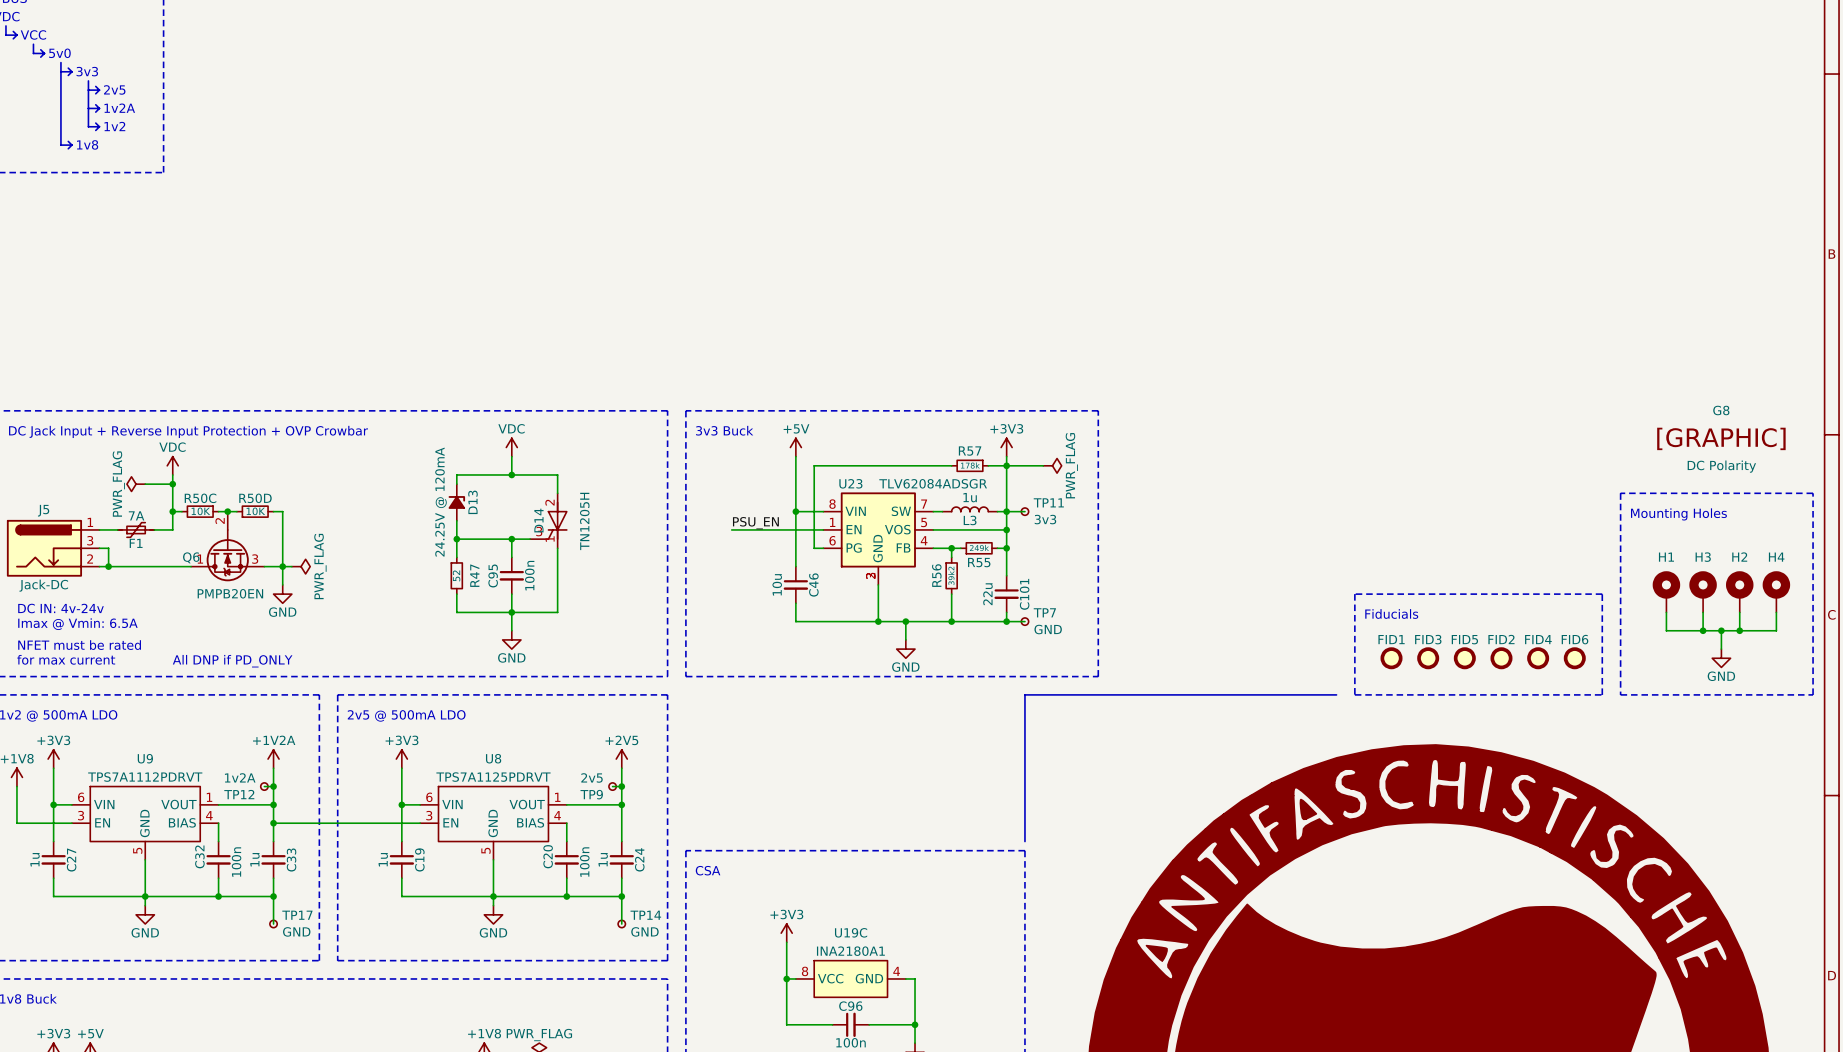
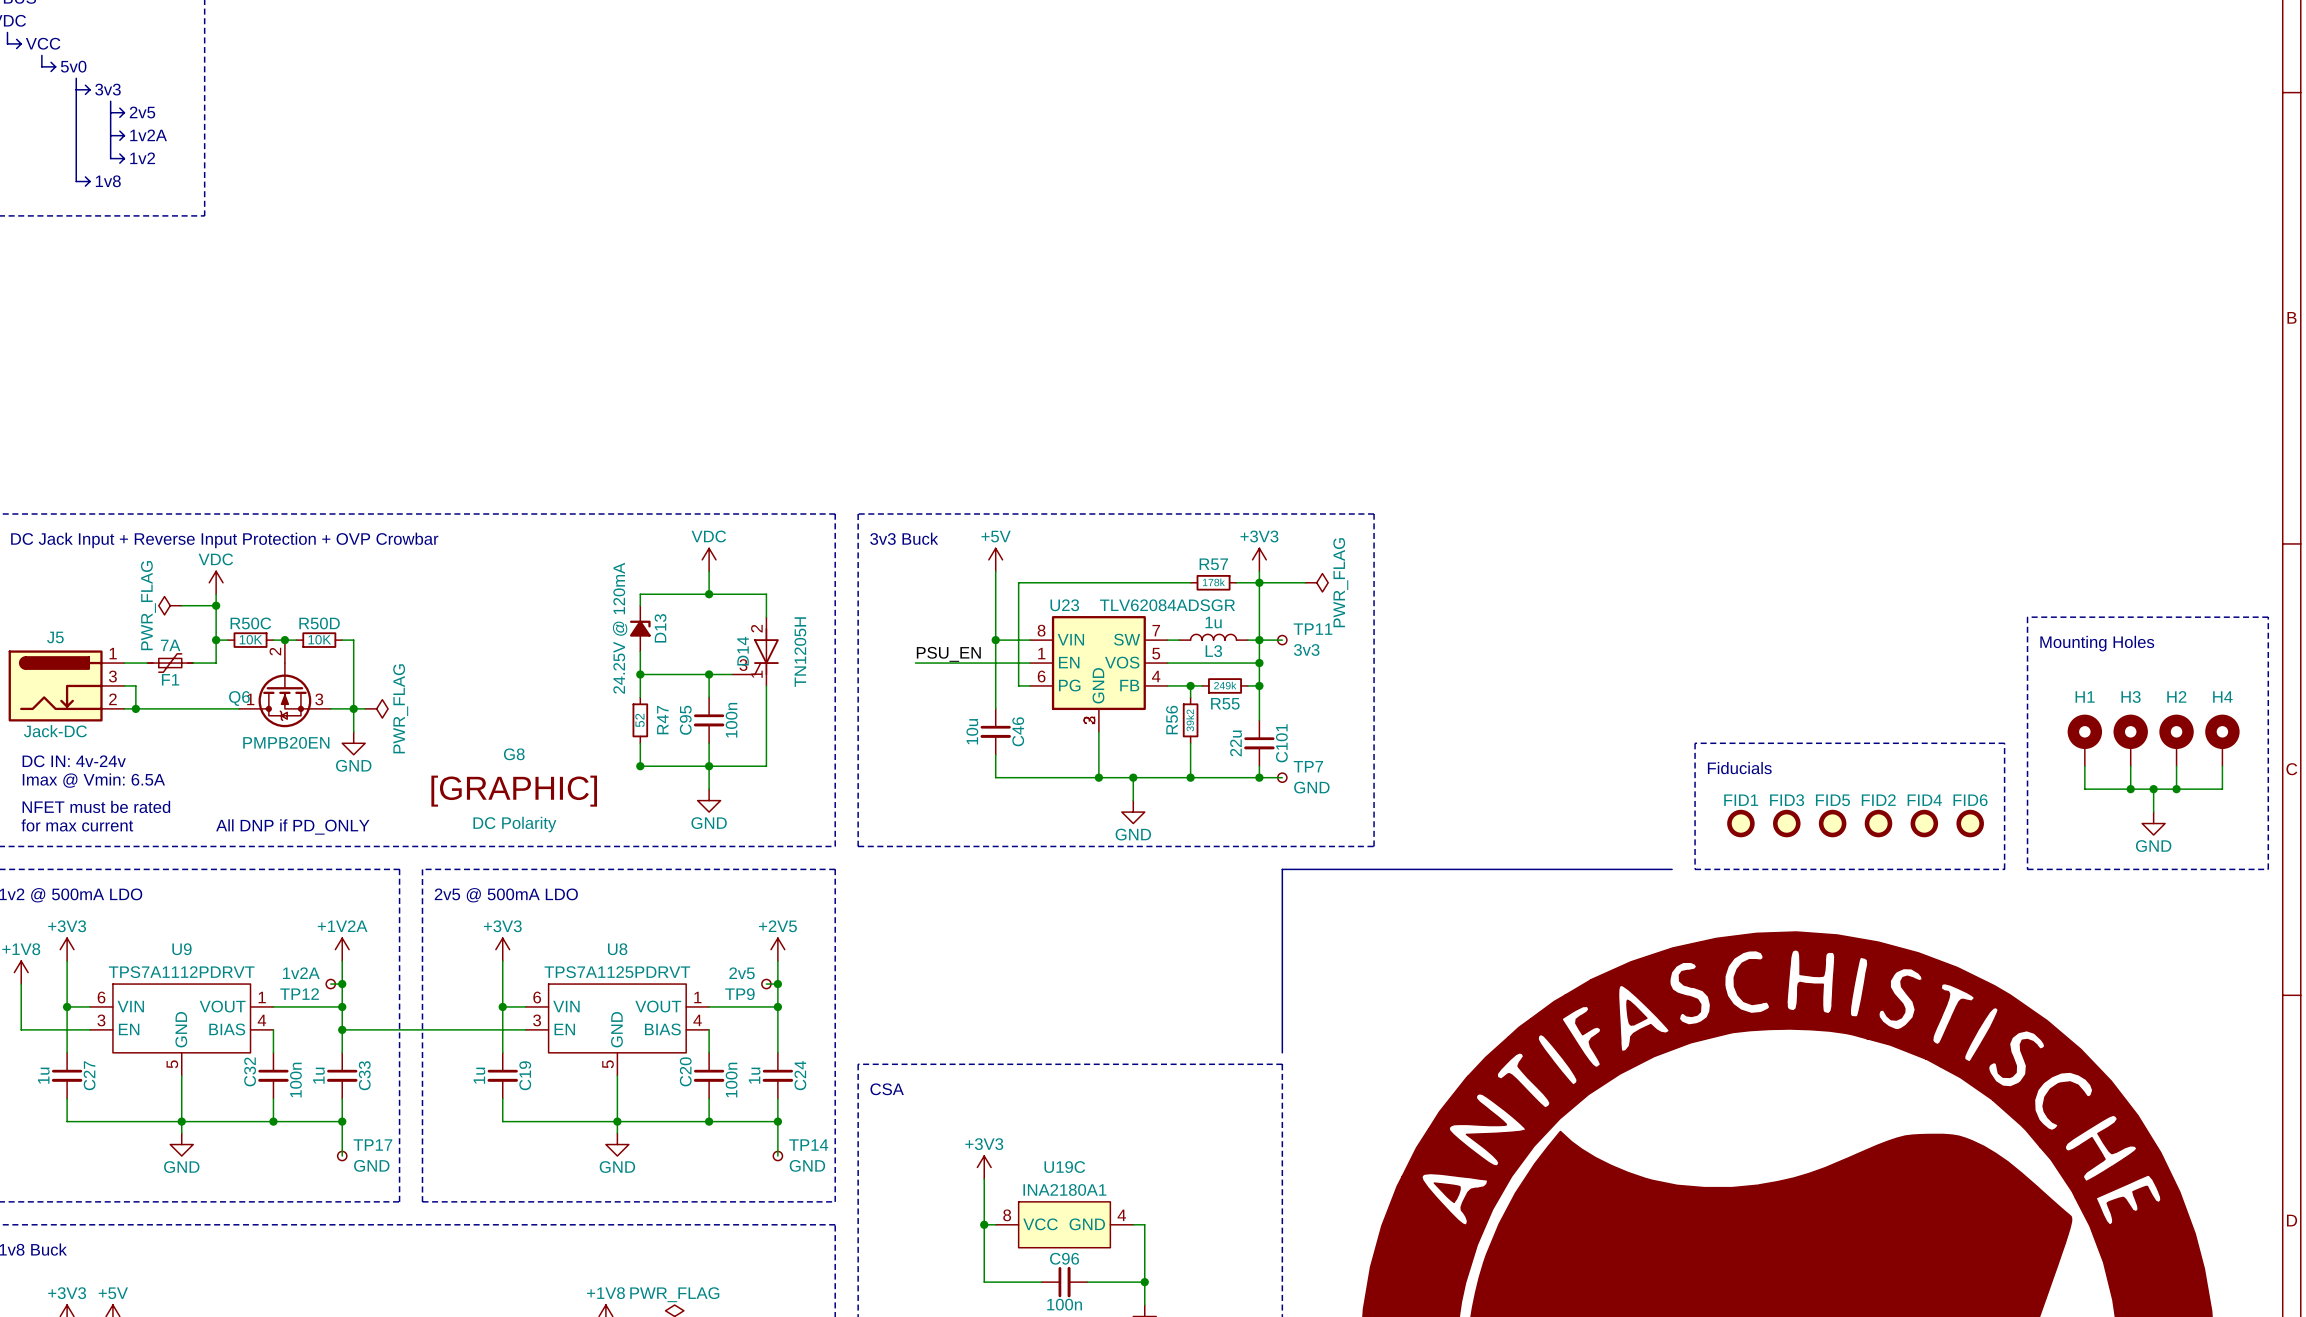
G8 position: (1721, 439) -> (514, 790)
power symbol position: VDC (511, 447) -> VDC (709, 559)
wire: (511, 456) (511, 474) (456, 474) (456, 484) -> none
wire: none -> (709, 571) (709, 594)
wire: none -> (640, 594) (640, 605)
junction: (511, 474) -> none
wire: (557, 474) (557, 493) -> (697, 594) (766, 594) (766, 617)
junction: none -> (709, 594)
D13 position: (456, 502) -> (640, 628)
wire: (456, 520) (456, 557) -> (709, 743) (709, 789)
D14 position: (548, 520) -> (755, 651)
wire: (456, 539) (511, 539) -> (640, 651) (640, 674)
junction: (456, 539) -> none
wire: none -> (663, 674) (732, 674)
wire: none -> (709, 674) (709, 697)
junction: none -> (709, 674)
wire: (557, 548) (557, 612) -> (766, 685) (766, 766) (697, 766)
R47 position: (456, 575) -> (640, 720)
C95 position: (511, 575) -> (709, 720)
wire: (456, 594) (456, 612) (511, 612) (511, 630) -> none
junction: none -> (709, 766)
power symbol position: GND (511, 639) -> GND (709, 800)

